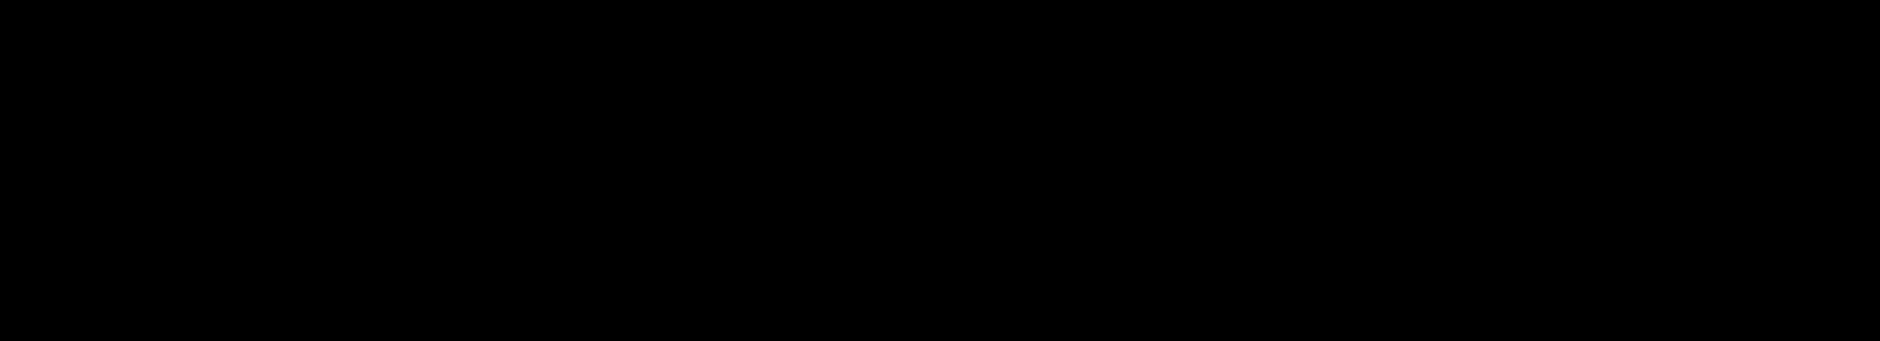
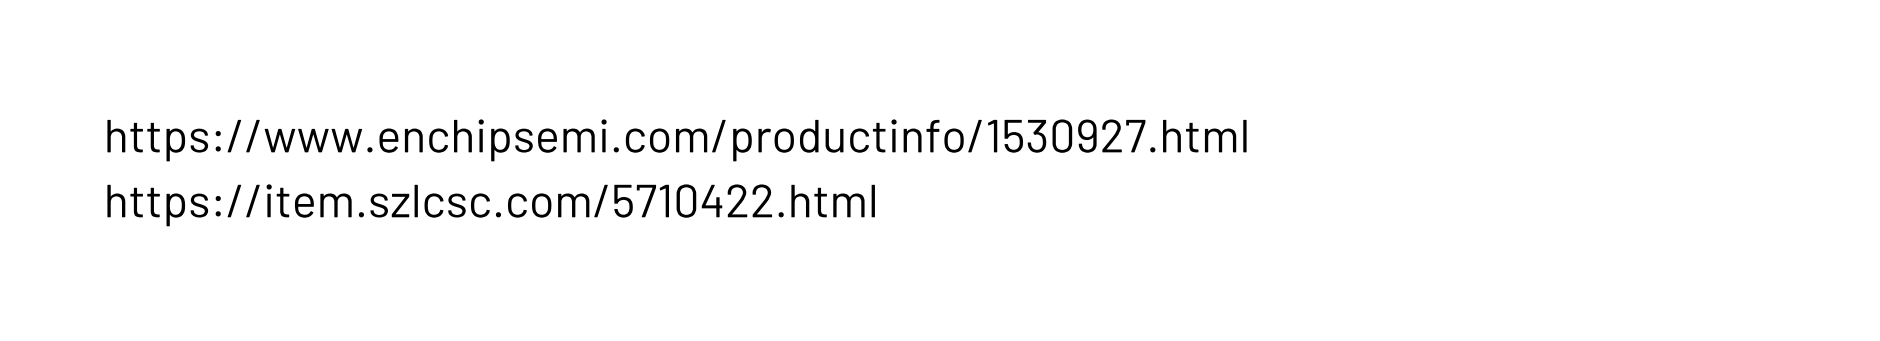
text: none -> https://www.enchipsemi.com/productinfo/1530927.html (677, 140)
text: none -> https://item.szlcsc.com/5710422.html (491, 205)

